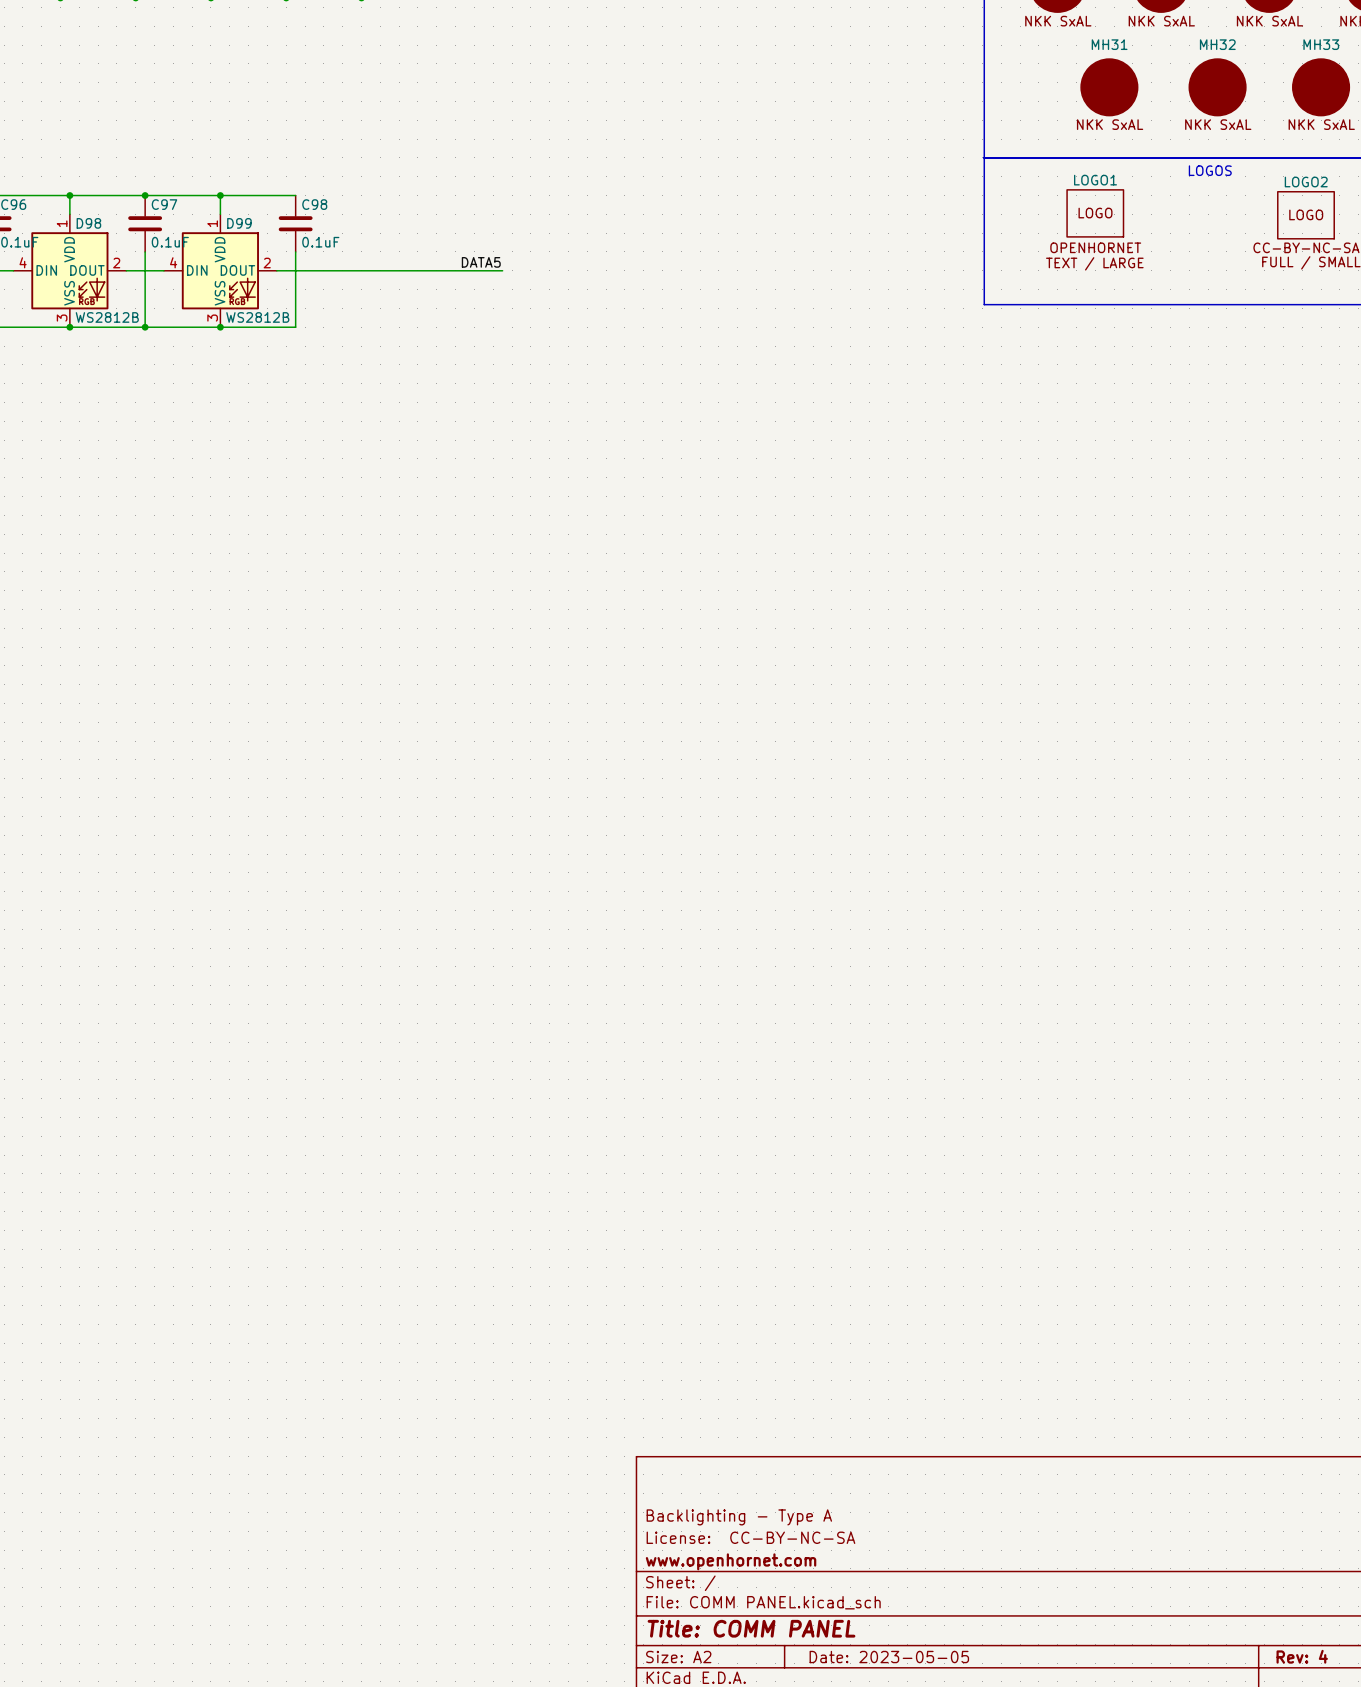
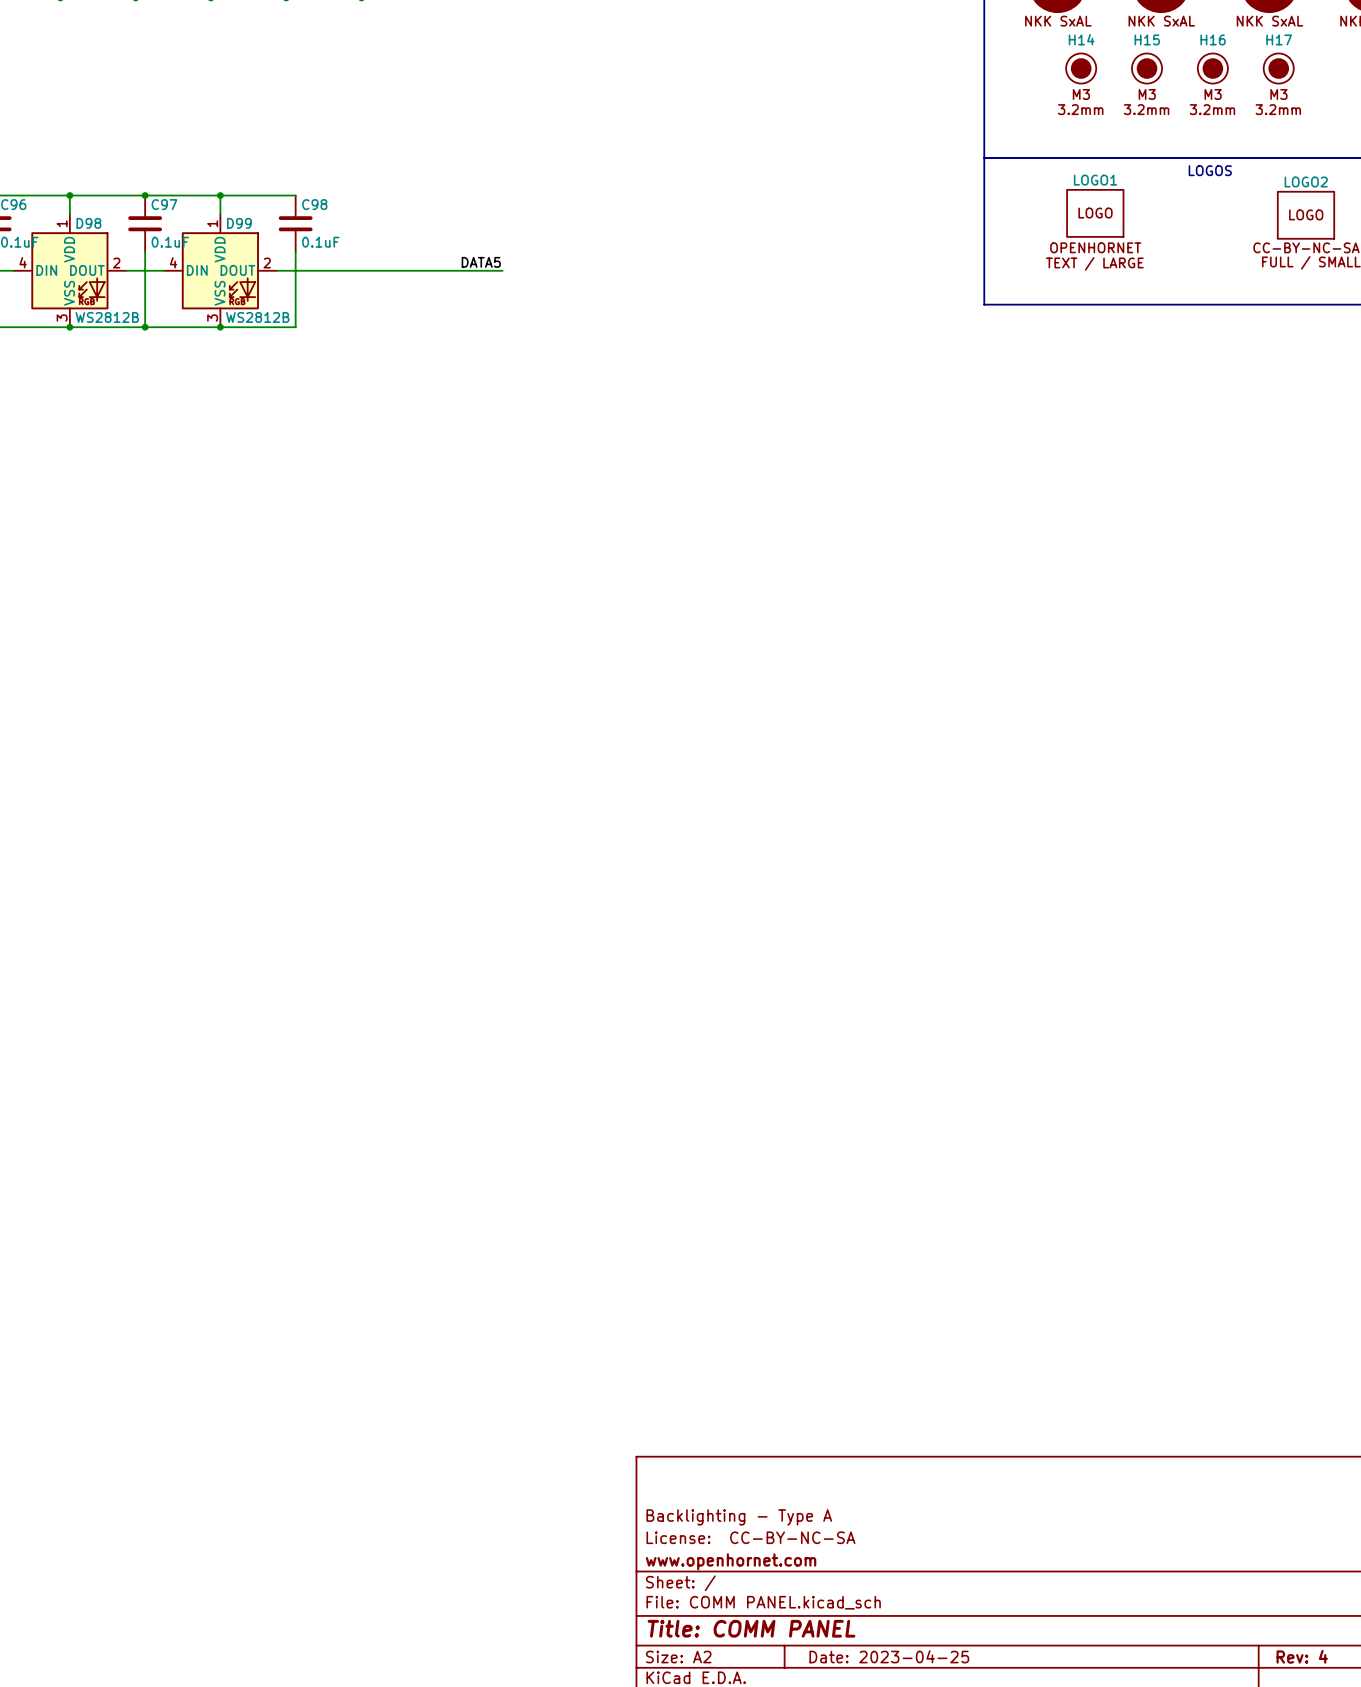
H14: none -> (1081, 68)
H15: none -> (1147, 68)
H16: none -> (1212, 68)
H17: none -> (1278, 68)
MH31: (1109, 87) -> none
MH32: (1217, 87) -> none
MH33: (1321, 87) -> none
title block: Date: 2023-05-05 (889, 1657) -> Date: 2023-04-25 (889, 1656)

